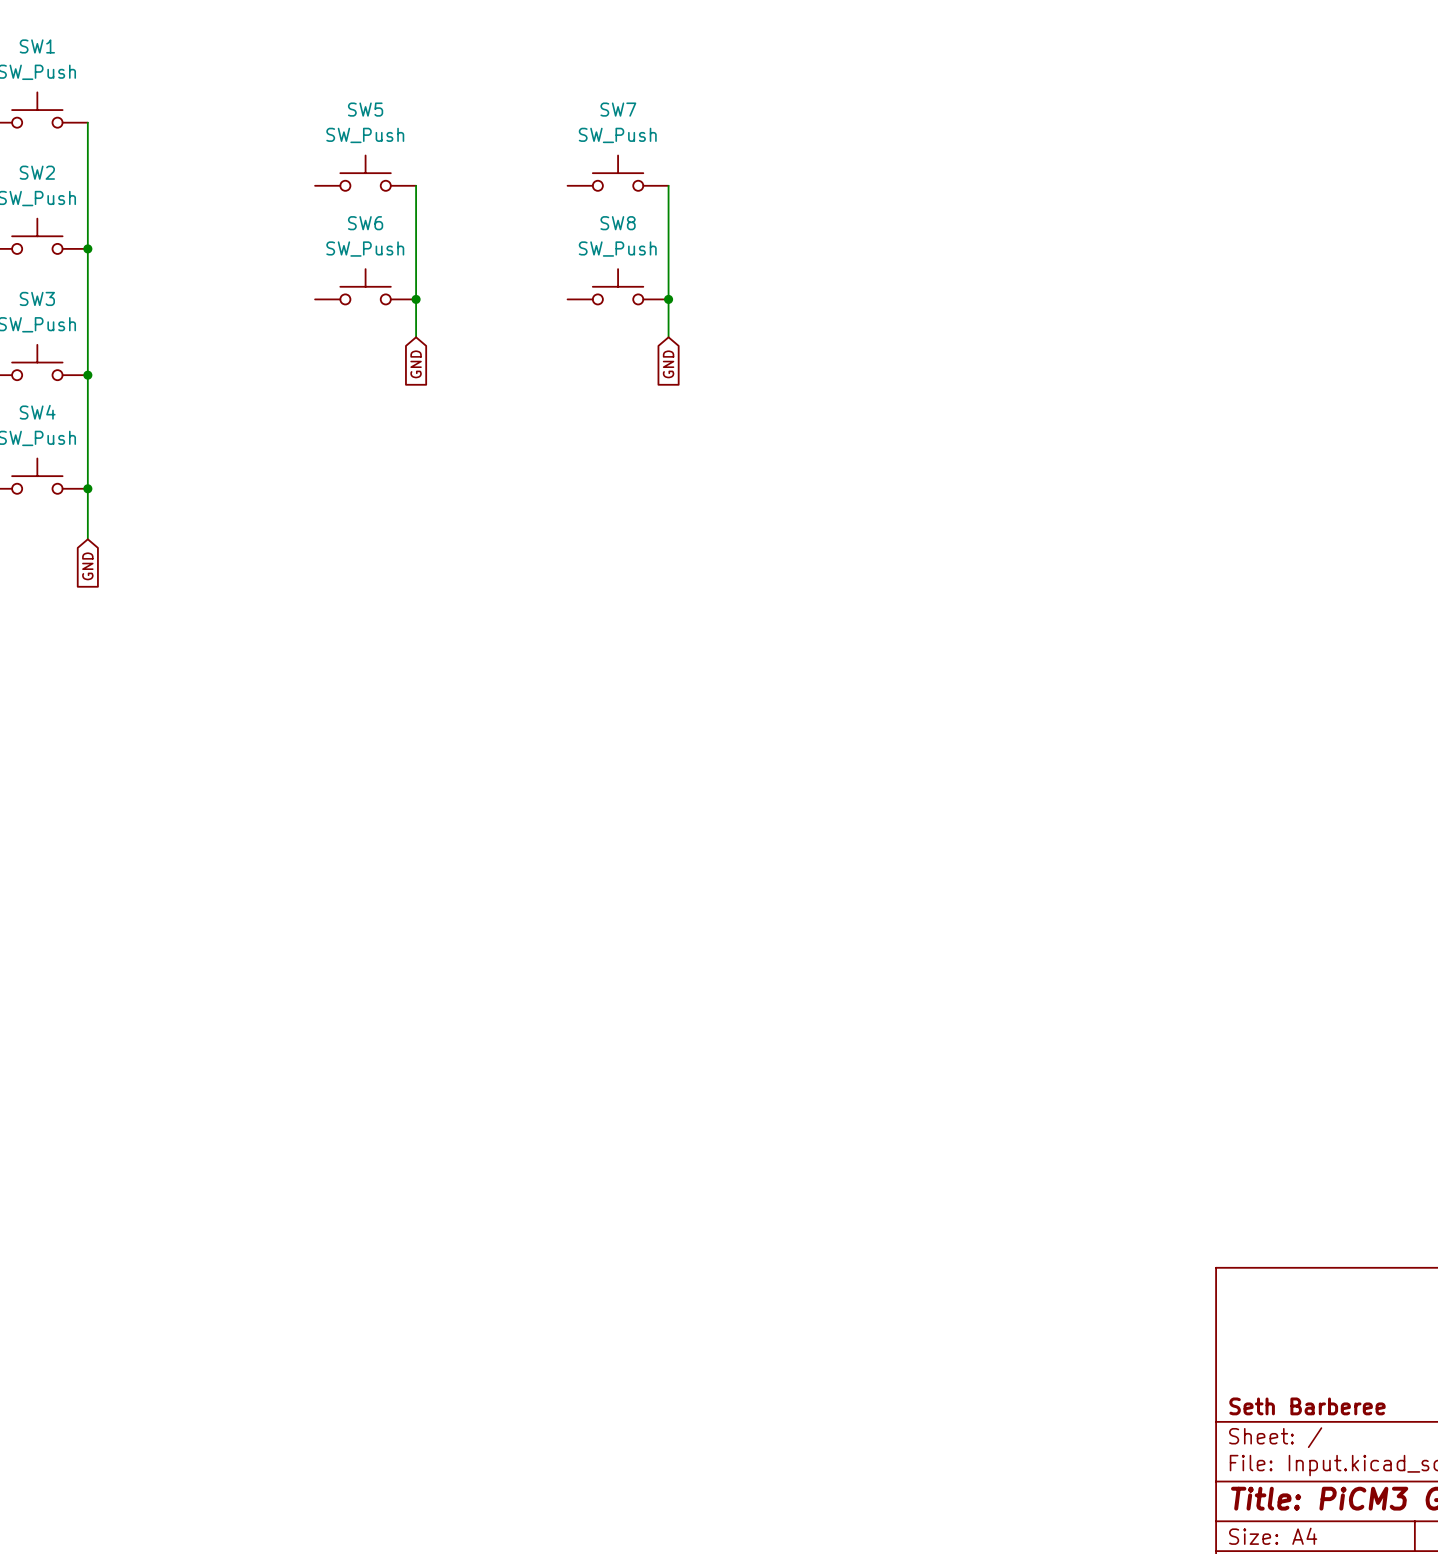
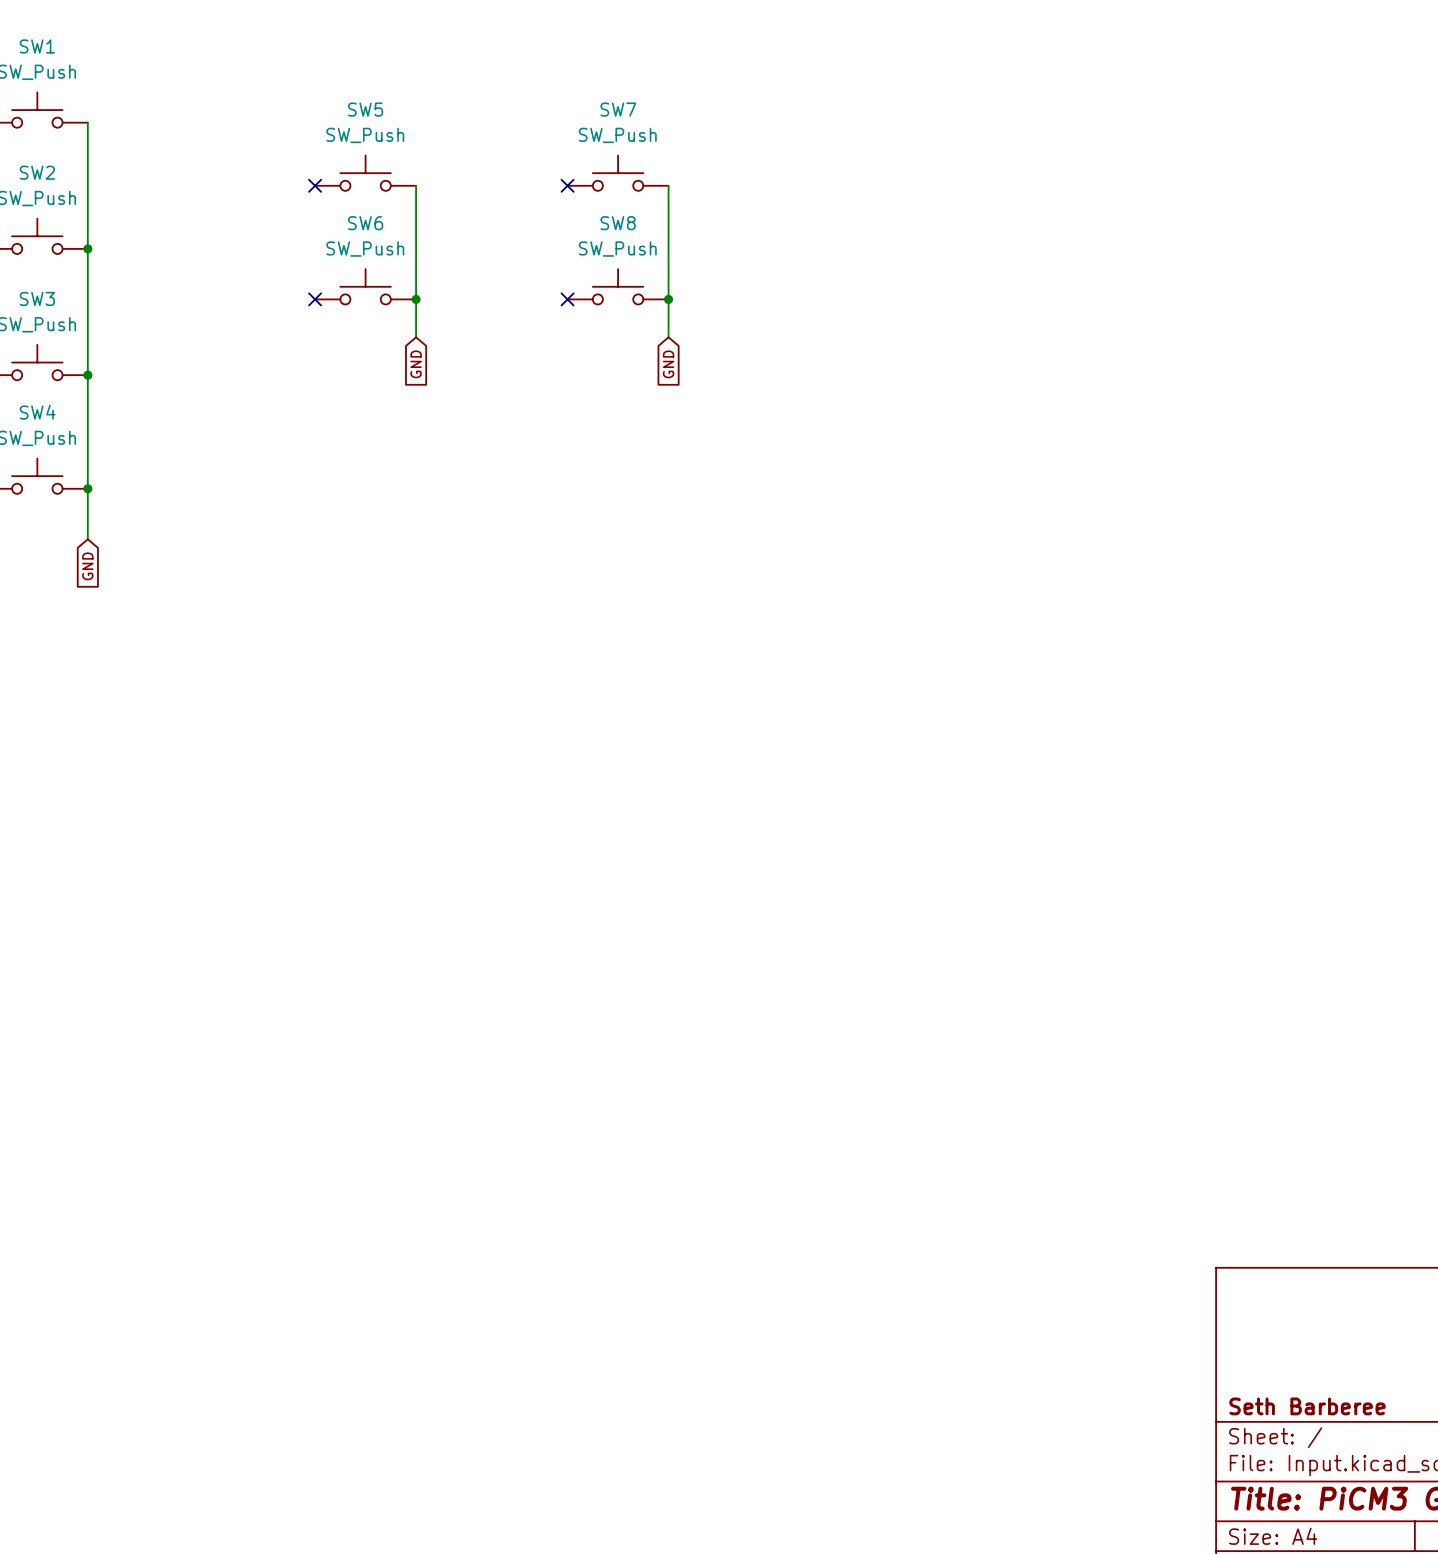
no-connect mark: none -> (315, 185)
no-connect mark: none -> (567, 185)
no-connect mark: none -> (315, 299)
no-connect mark: none -> (567, 299)

